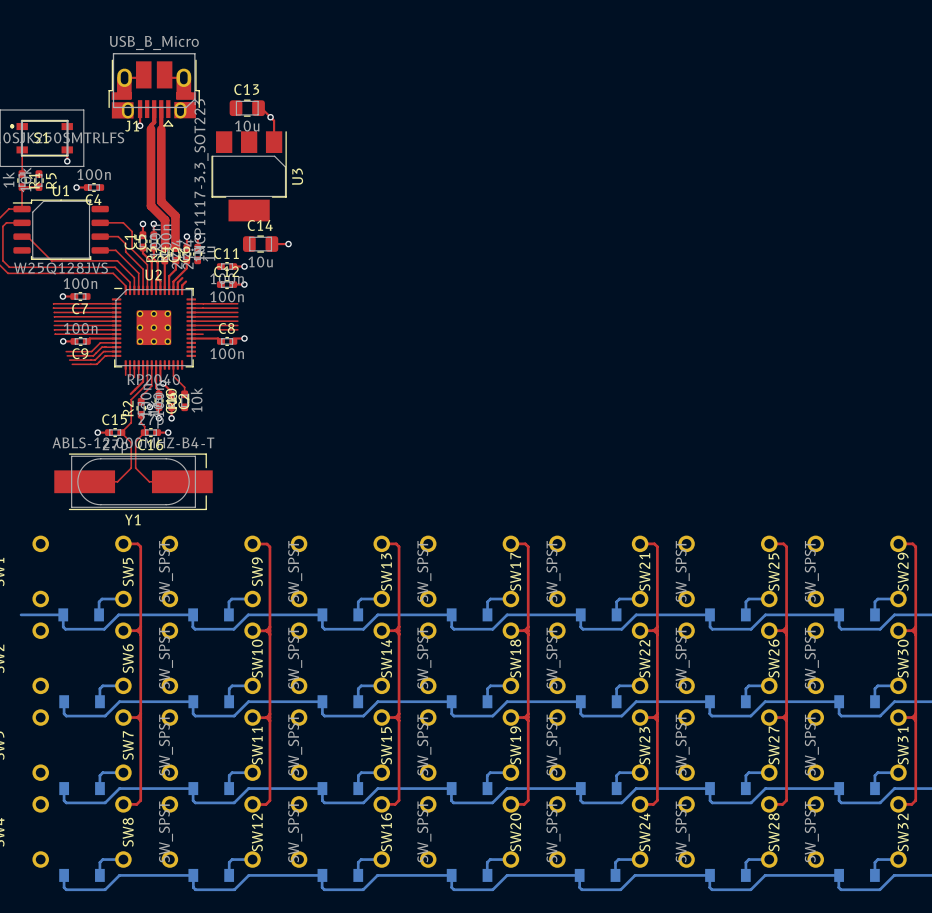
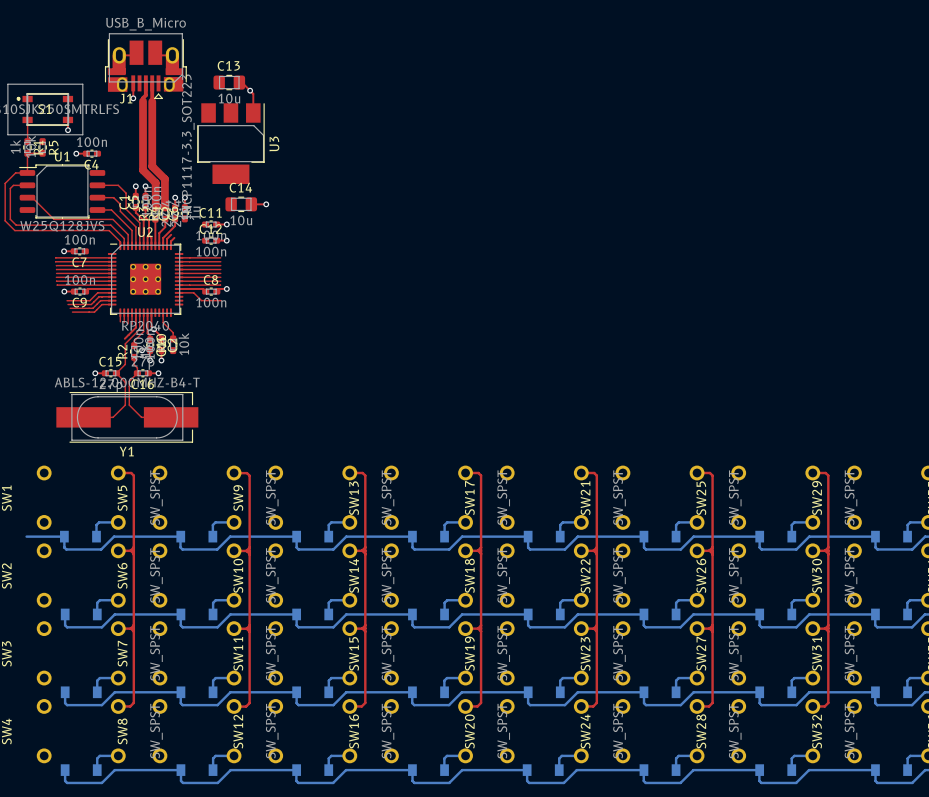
top track: none -> (189, 285) (220, 285)
top track: none -> (179, 292) (193, 292) (201, 300) (221, 300)

